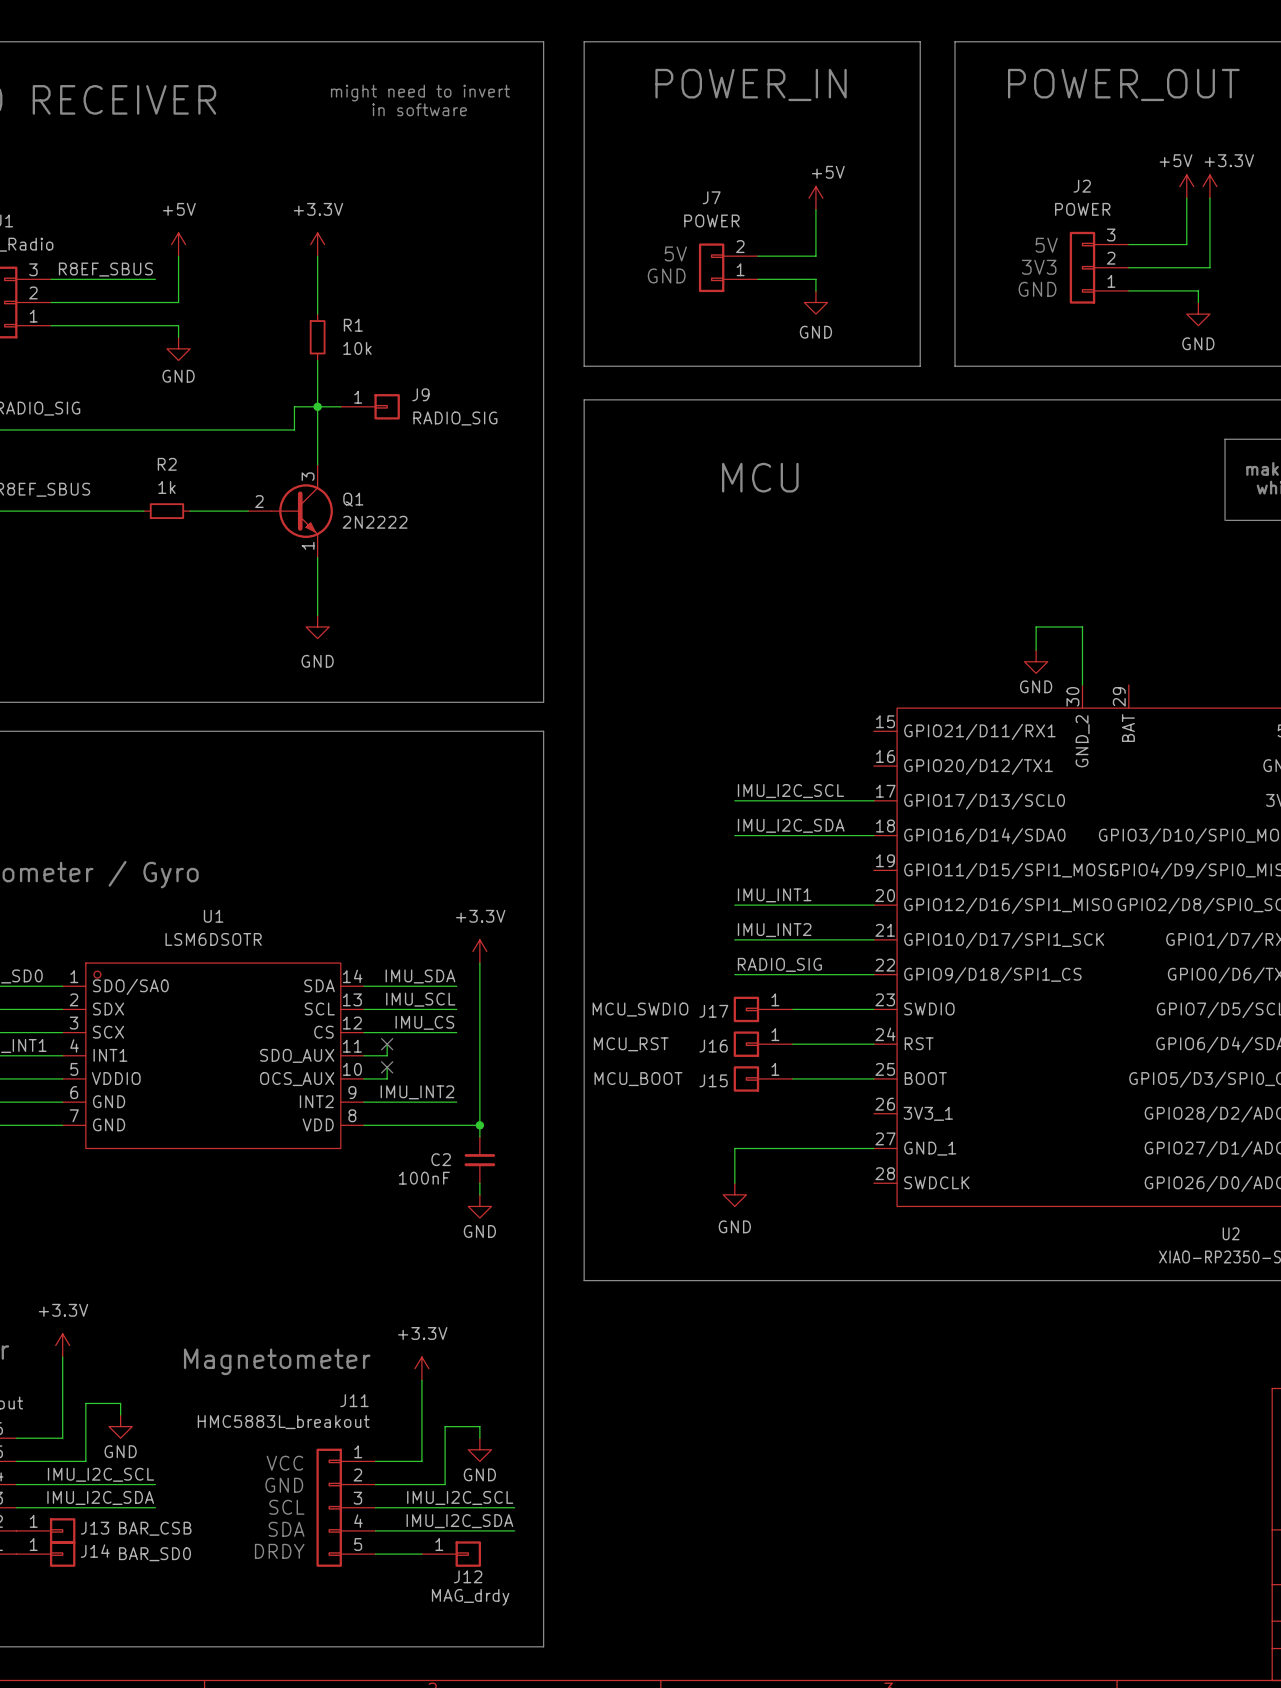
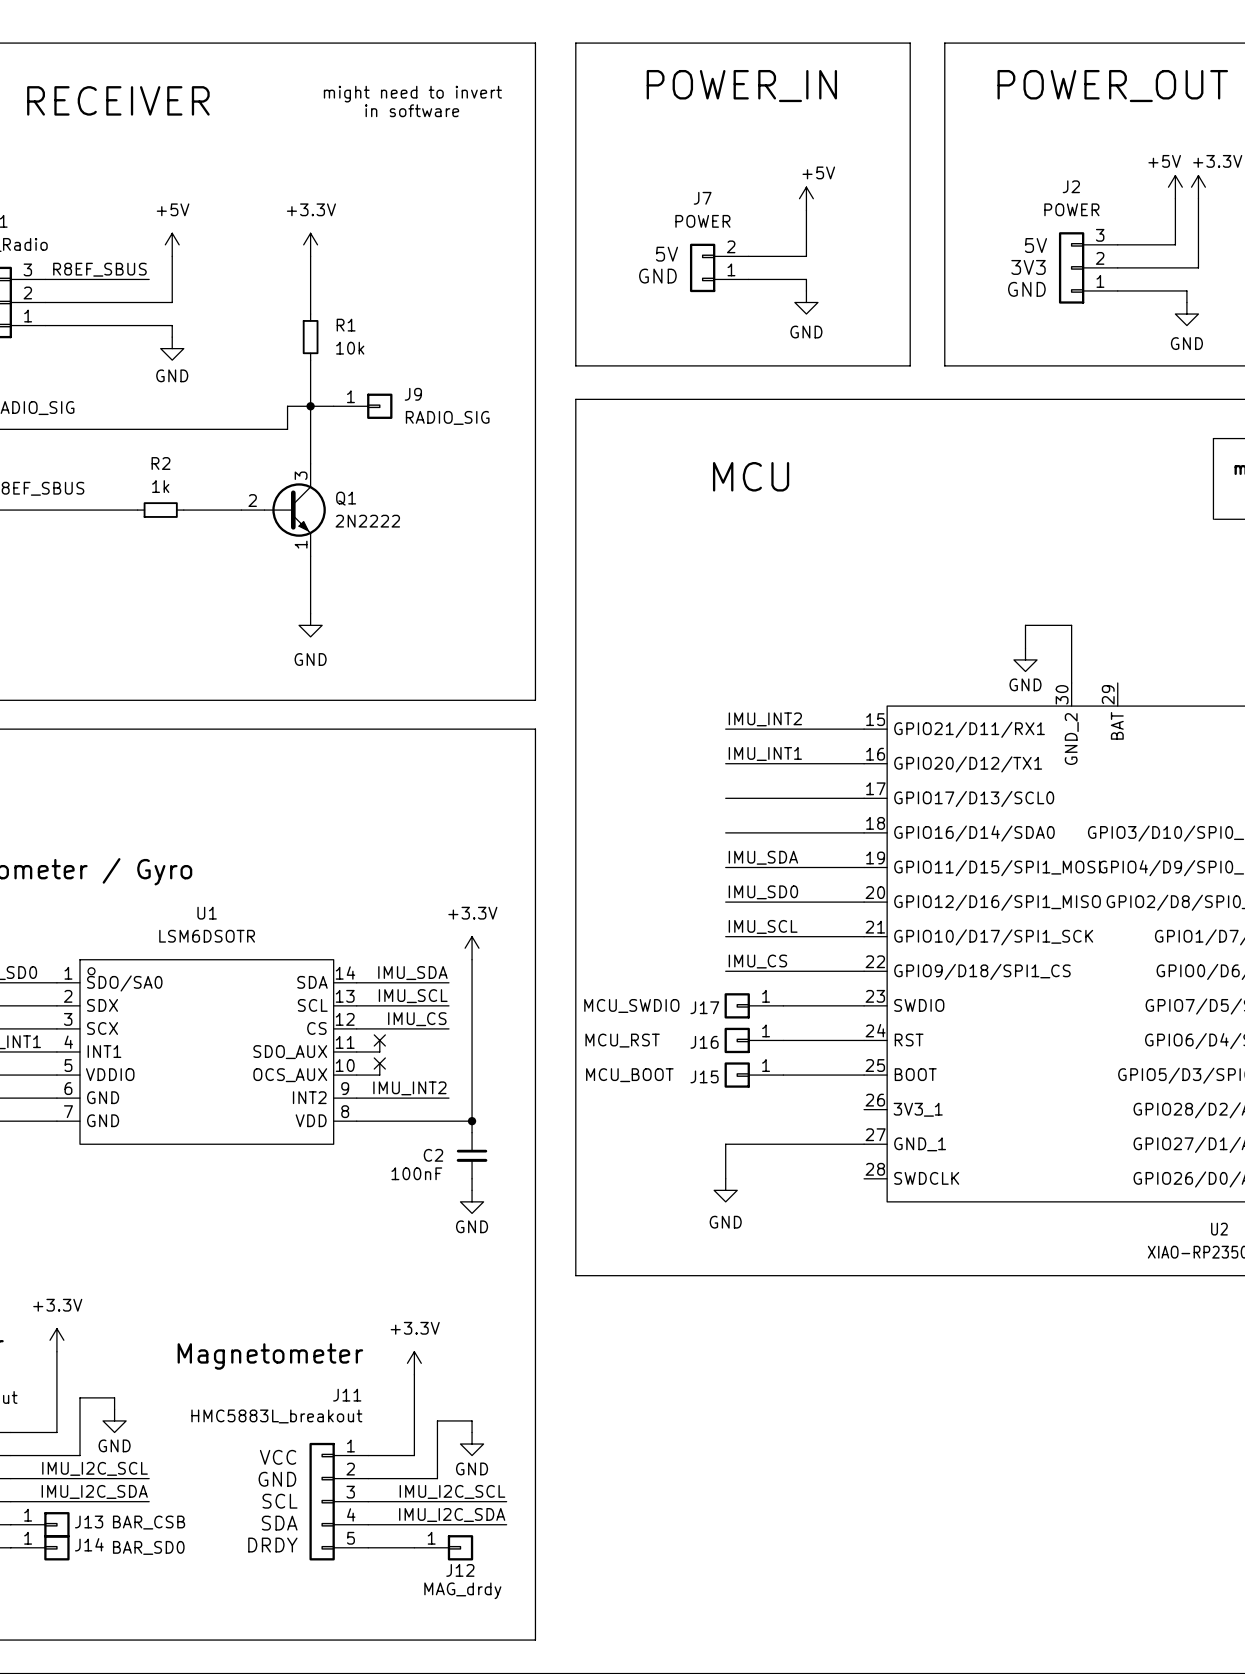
label: none -> IMU_INT2 (765, 719)
wire: none -> (725, 729) (864, 729)
label: none -> IMU_INT1 (765, 753)
wire: none -> (725, 763) (864, 763)
label: IMU_I2C_SCL (790, 791) -> none
label: IMU_I2C_SDA (791, 825) -> none
label: none -> IMU_SDA (763, 857)
wire: none -> (725, 867) (864, 867)
label: IMU_INT1 (774, 895) -> IMU_SD0 (763, 892)
label: IMU_INT2 (774, 930) -> IMU_SCL (763, 926)
label: RADIO_SIG (779, 964) -> IMU_CS (757, 961)

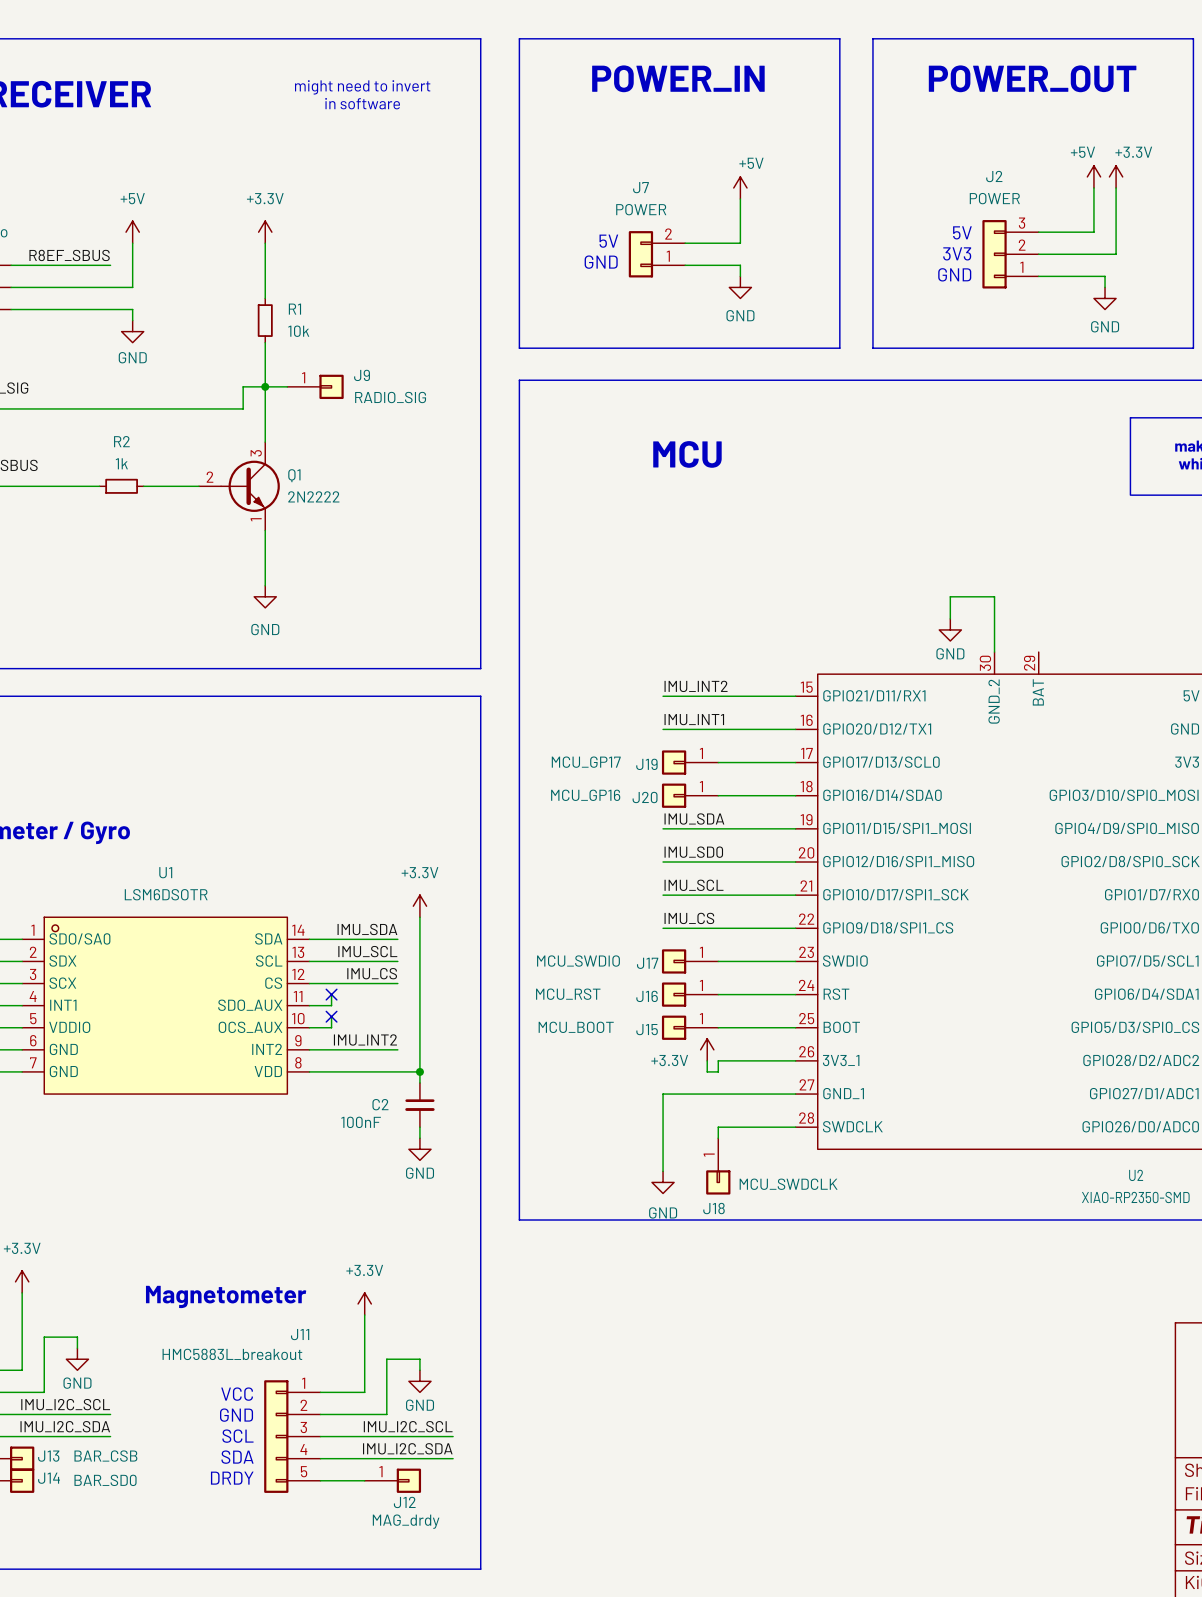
J19: none -> MCU_GP17 (690, 762)
J20: none -> MCU_GP16 (690, 795)
power symbol: none -> +3.3V (707, 1049)
wire: none -> (707, 1060) (707, 1071) (718, 1071) (718, 1060) (795, 1060)
wire: none -> (663, 1127) (663, 1171)
wire: none -> (795, 1127) (718, 1127) (718, 1138)
power symbol position: GND (725, 1190) -> GND (663, 1182)
J18: none -> MCU_SWDCLK (718, 1166)

